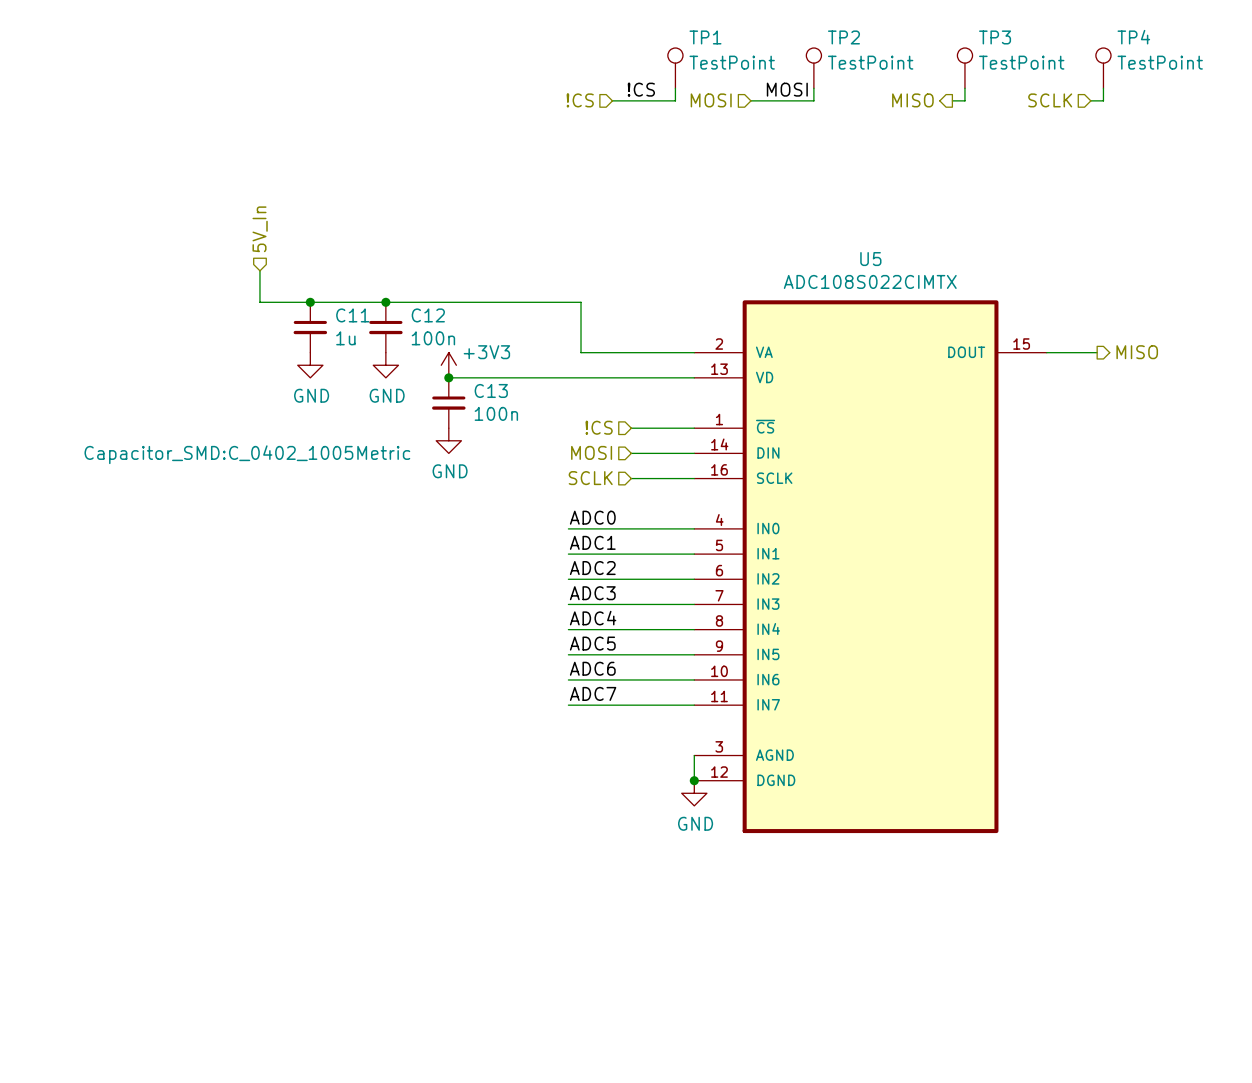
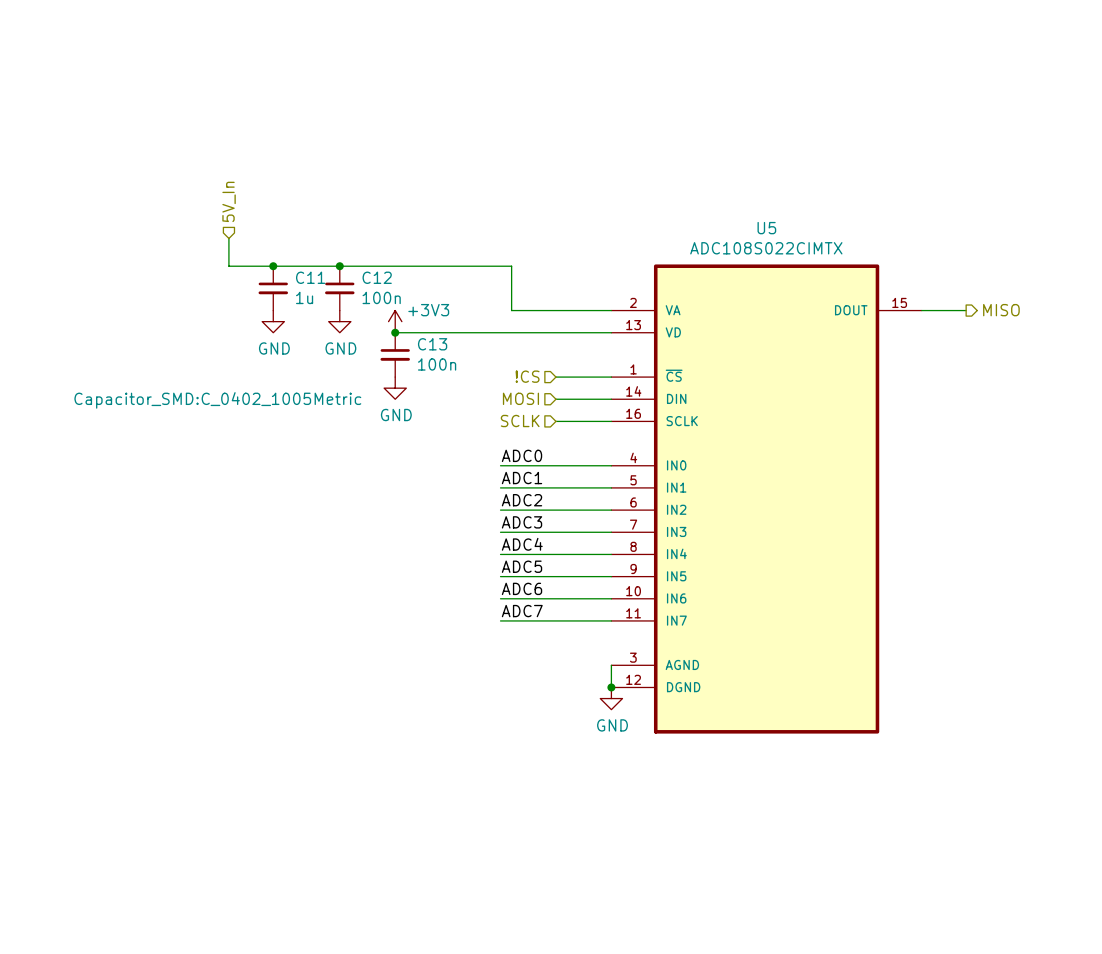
TP1: TestPoint (675, 68) -> none
TP2: TestPoint (813, 68) -> none
TP3: TestPoint (964, 68) -> none
TP4: TestPoint (1103, 68) -> none
wire: (675, 88) (675, 100) (612, 100) -> none
wire: (813, 88) (813, 100) (750, 100) -> none
wire: (964, 88) (964, 100) (952, 100) -> none
wire: (1103, 88) (1103, 100) (1090, 100) -> none
label: !CS (641, 89) -> none
label: MOSI (787, 89) -> none
hierarchical label: !CS (580, 100) -> none
hierarchical label: MOSI (711, 100) -> none
hierarchical label: MISO (912, 100) -> none
hierarchical label: SCLK (1050, 100) -> none

